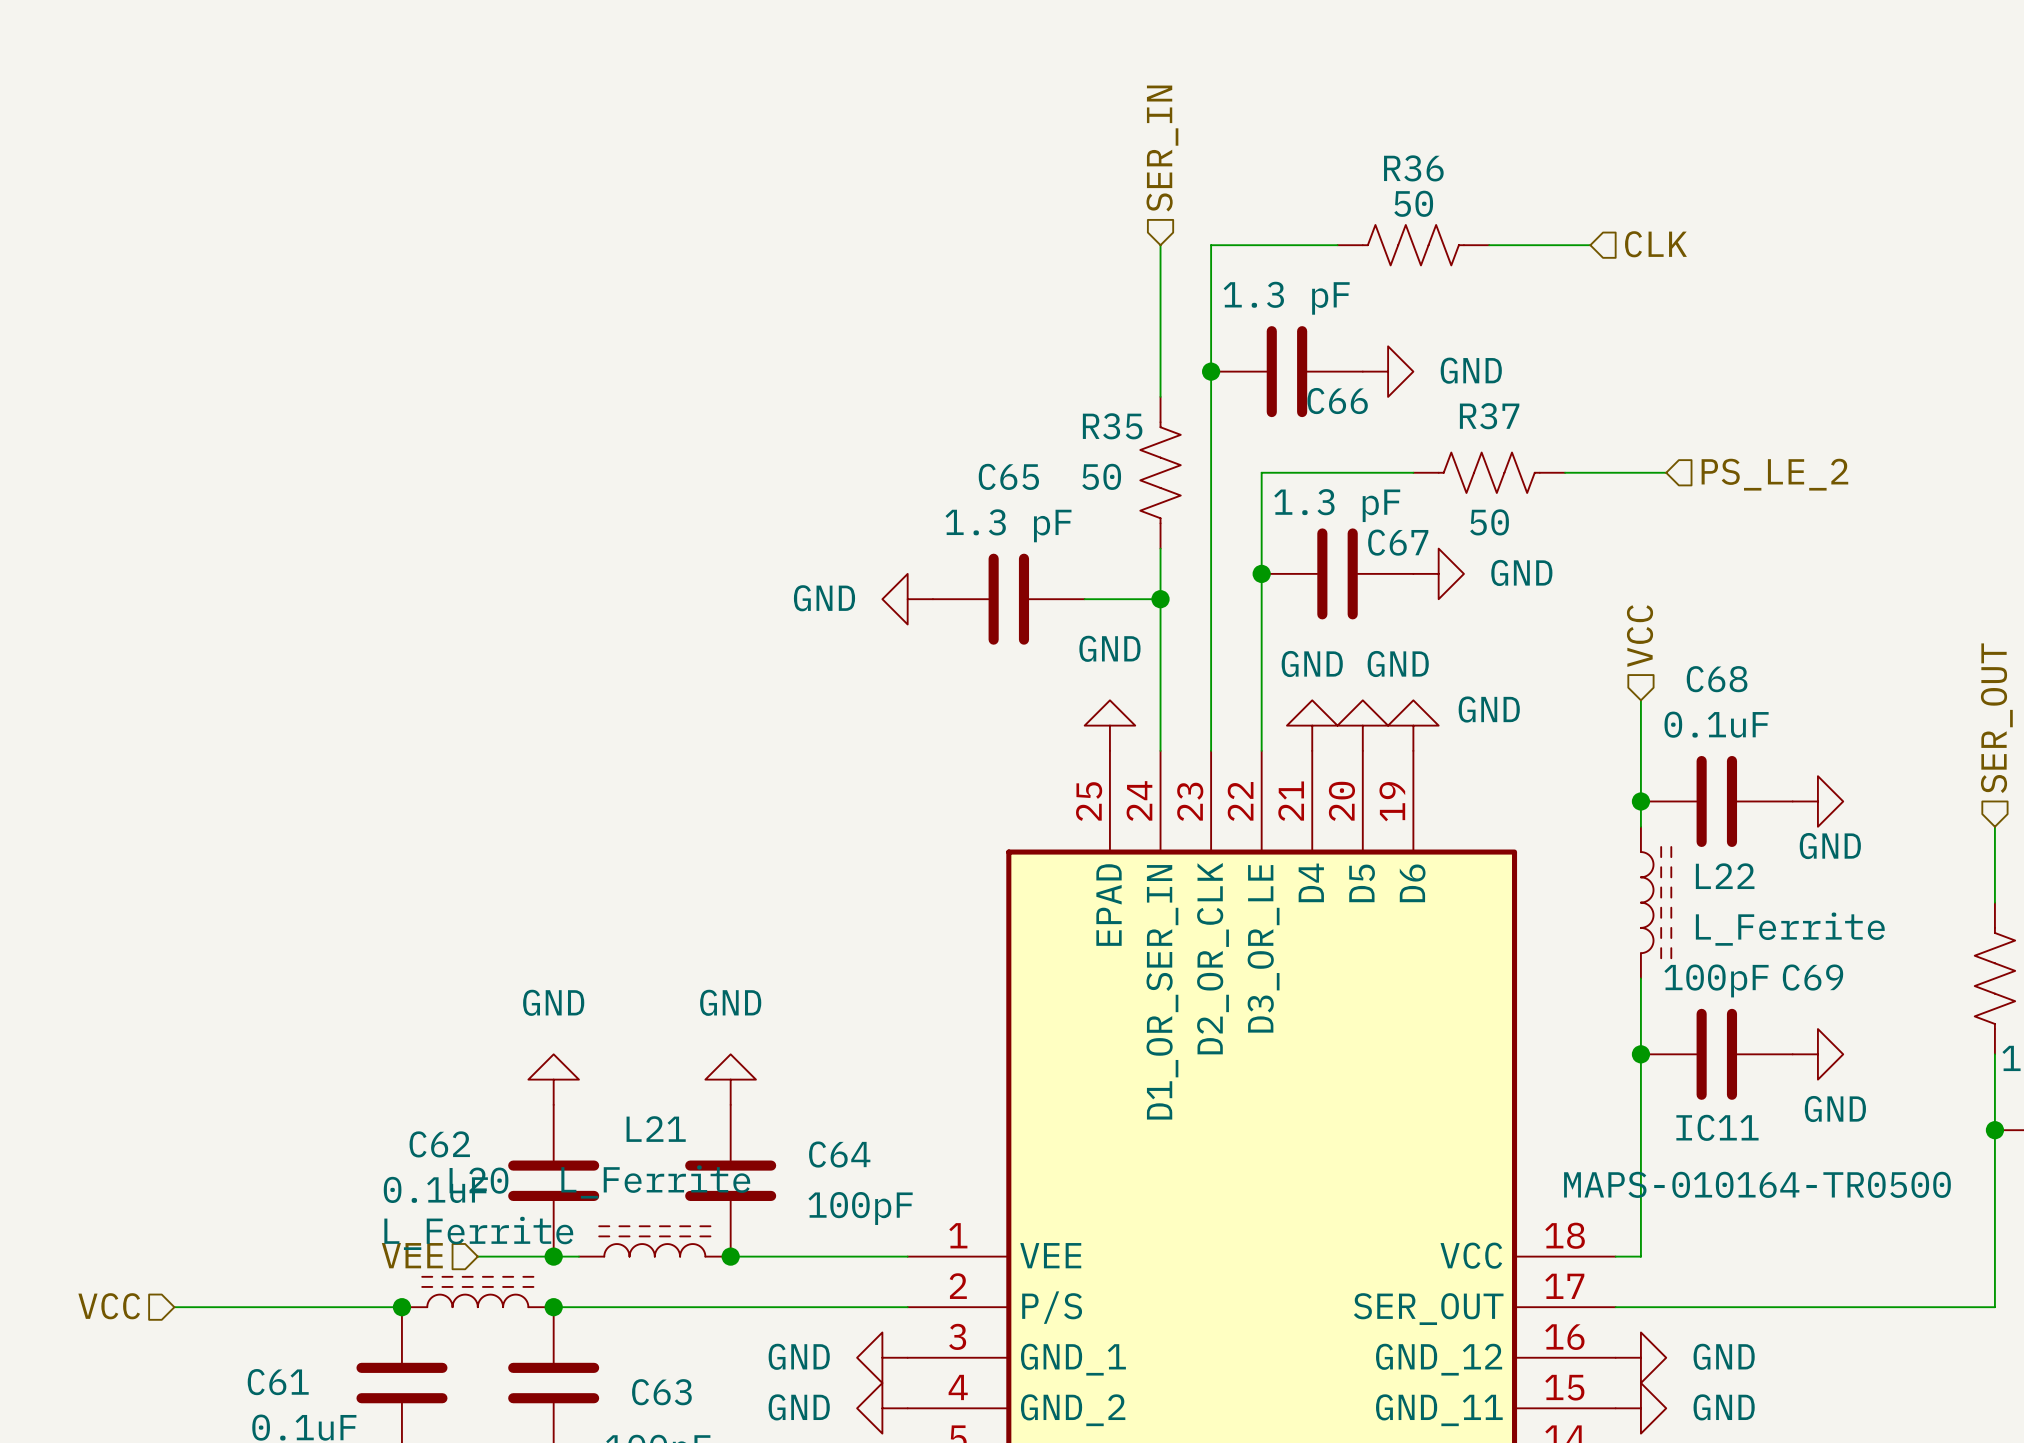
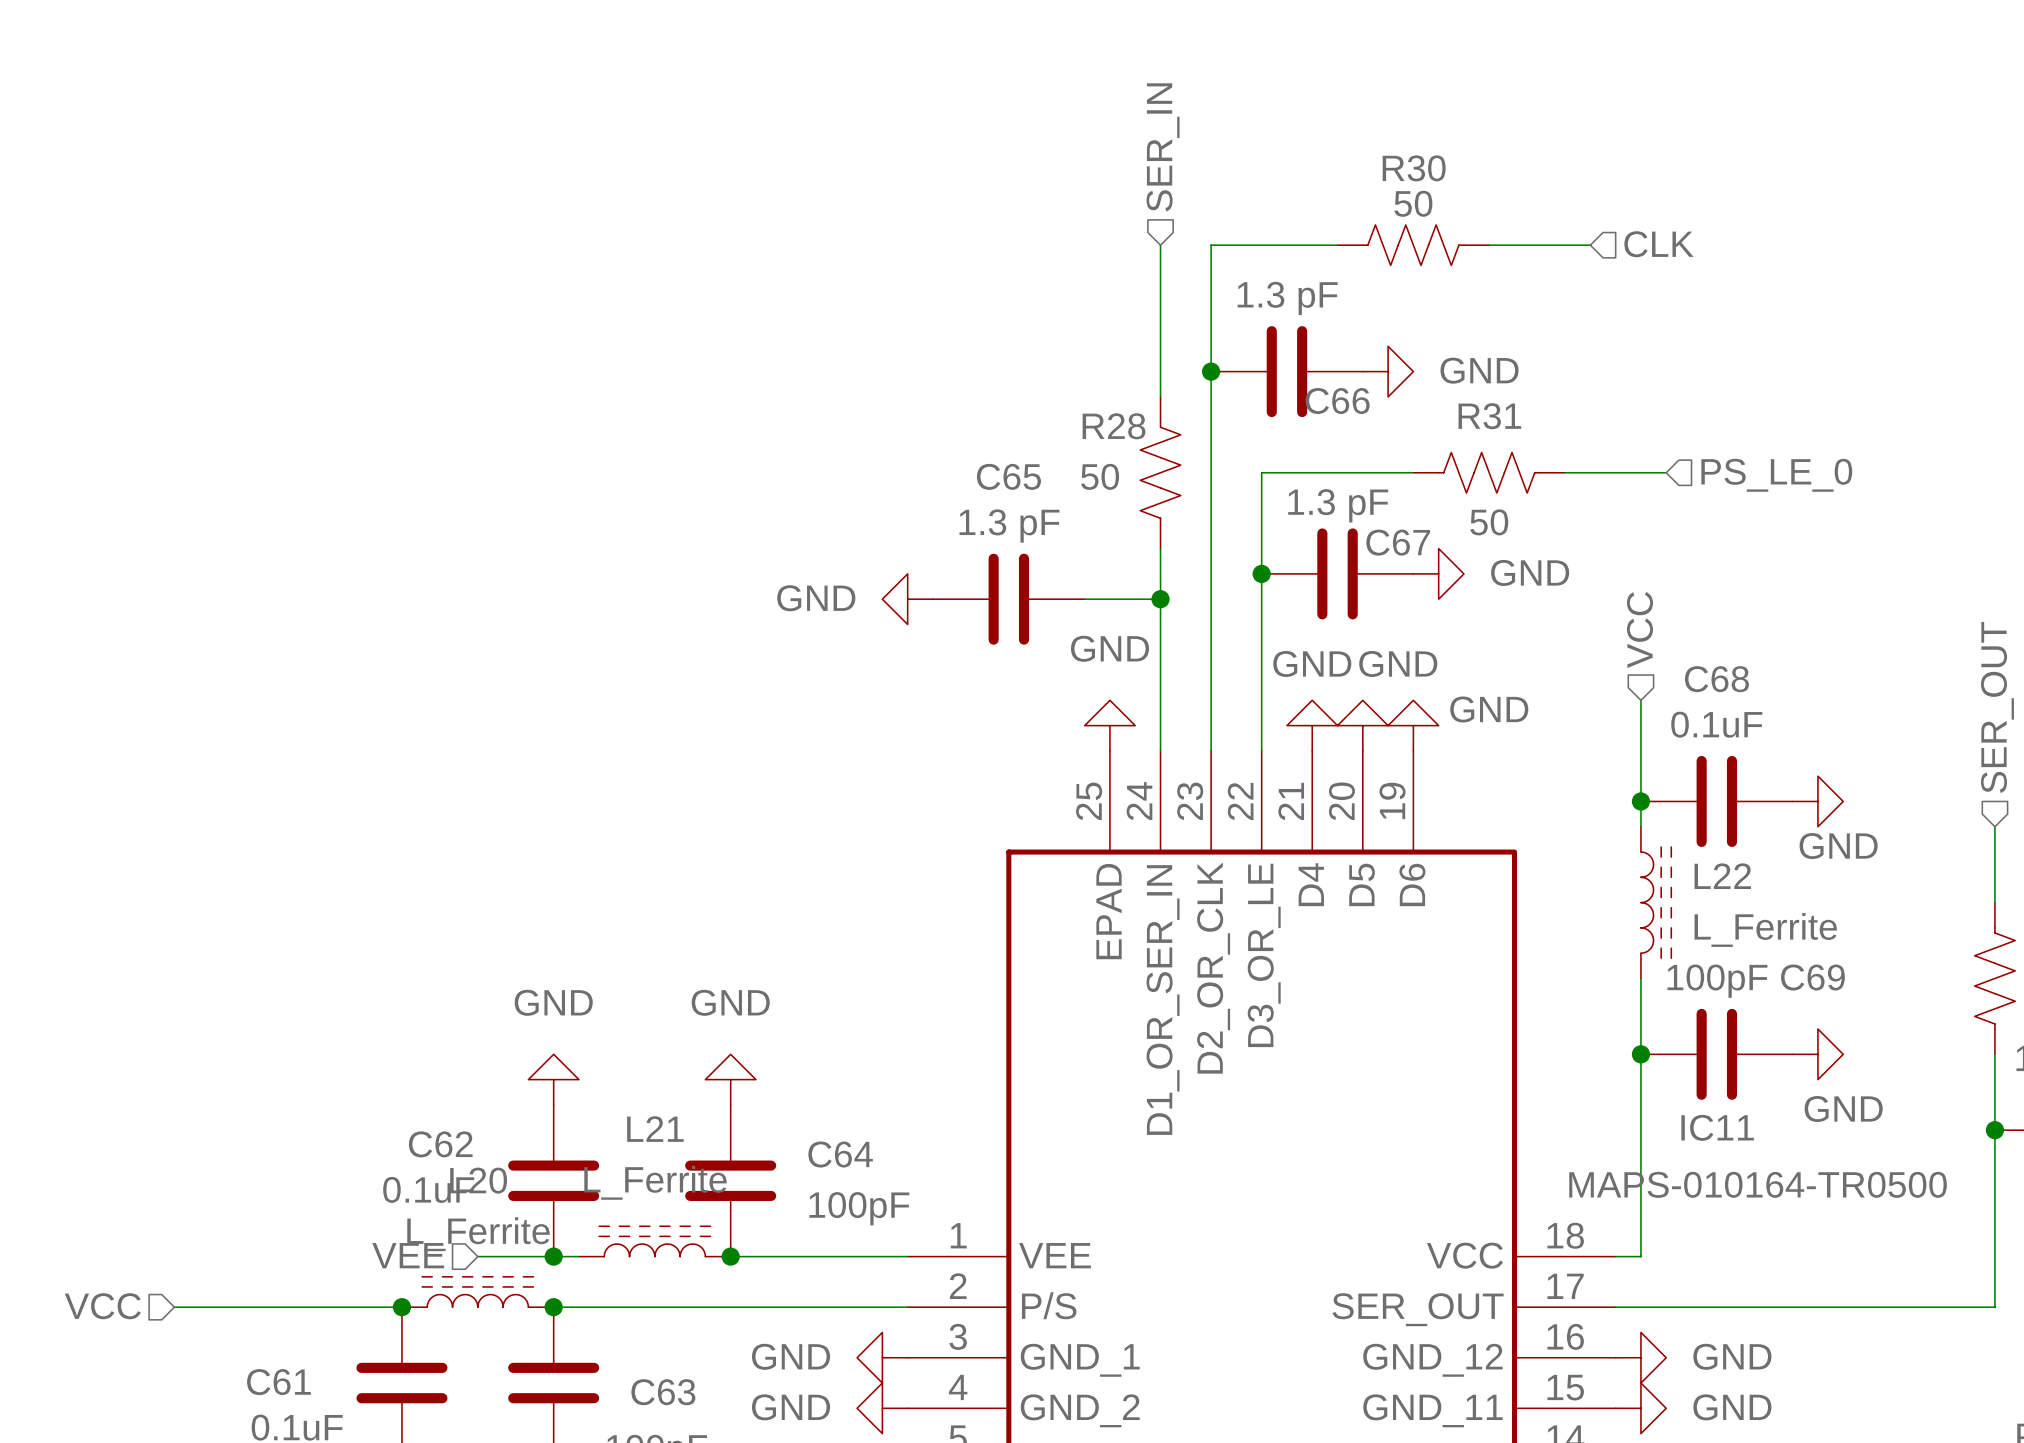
R36 name: R36 (1413, 168) -> R30 (1414, 168)
R37 name: R37 (1489, 416) -> R31 (1489, 416)
R35 name: R35 (1112, 426) -> R28 (1114, 426)
hierarchical label: PS_LE_2 (1774, 474) -> PS_LE_0 (1776, 475)

